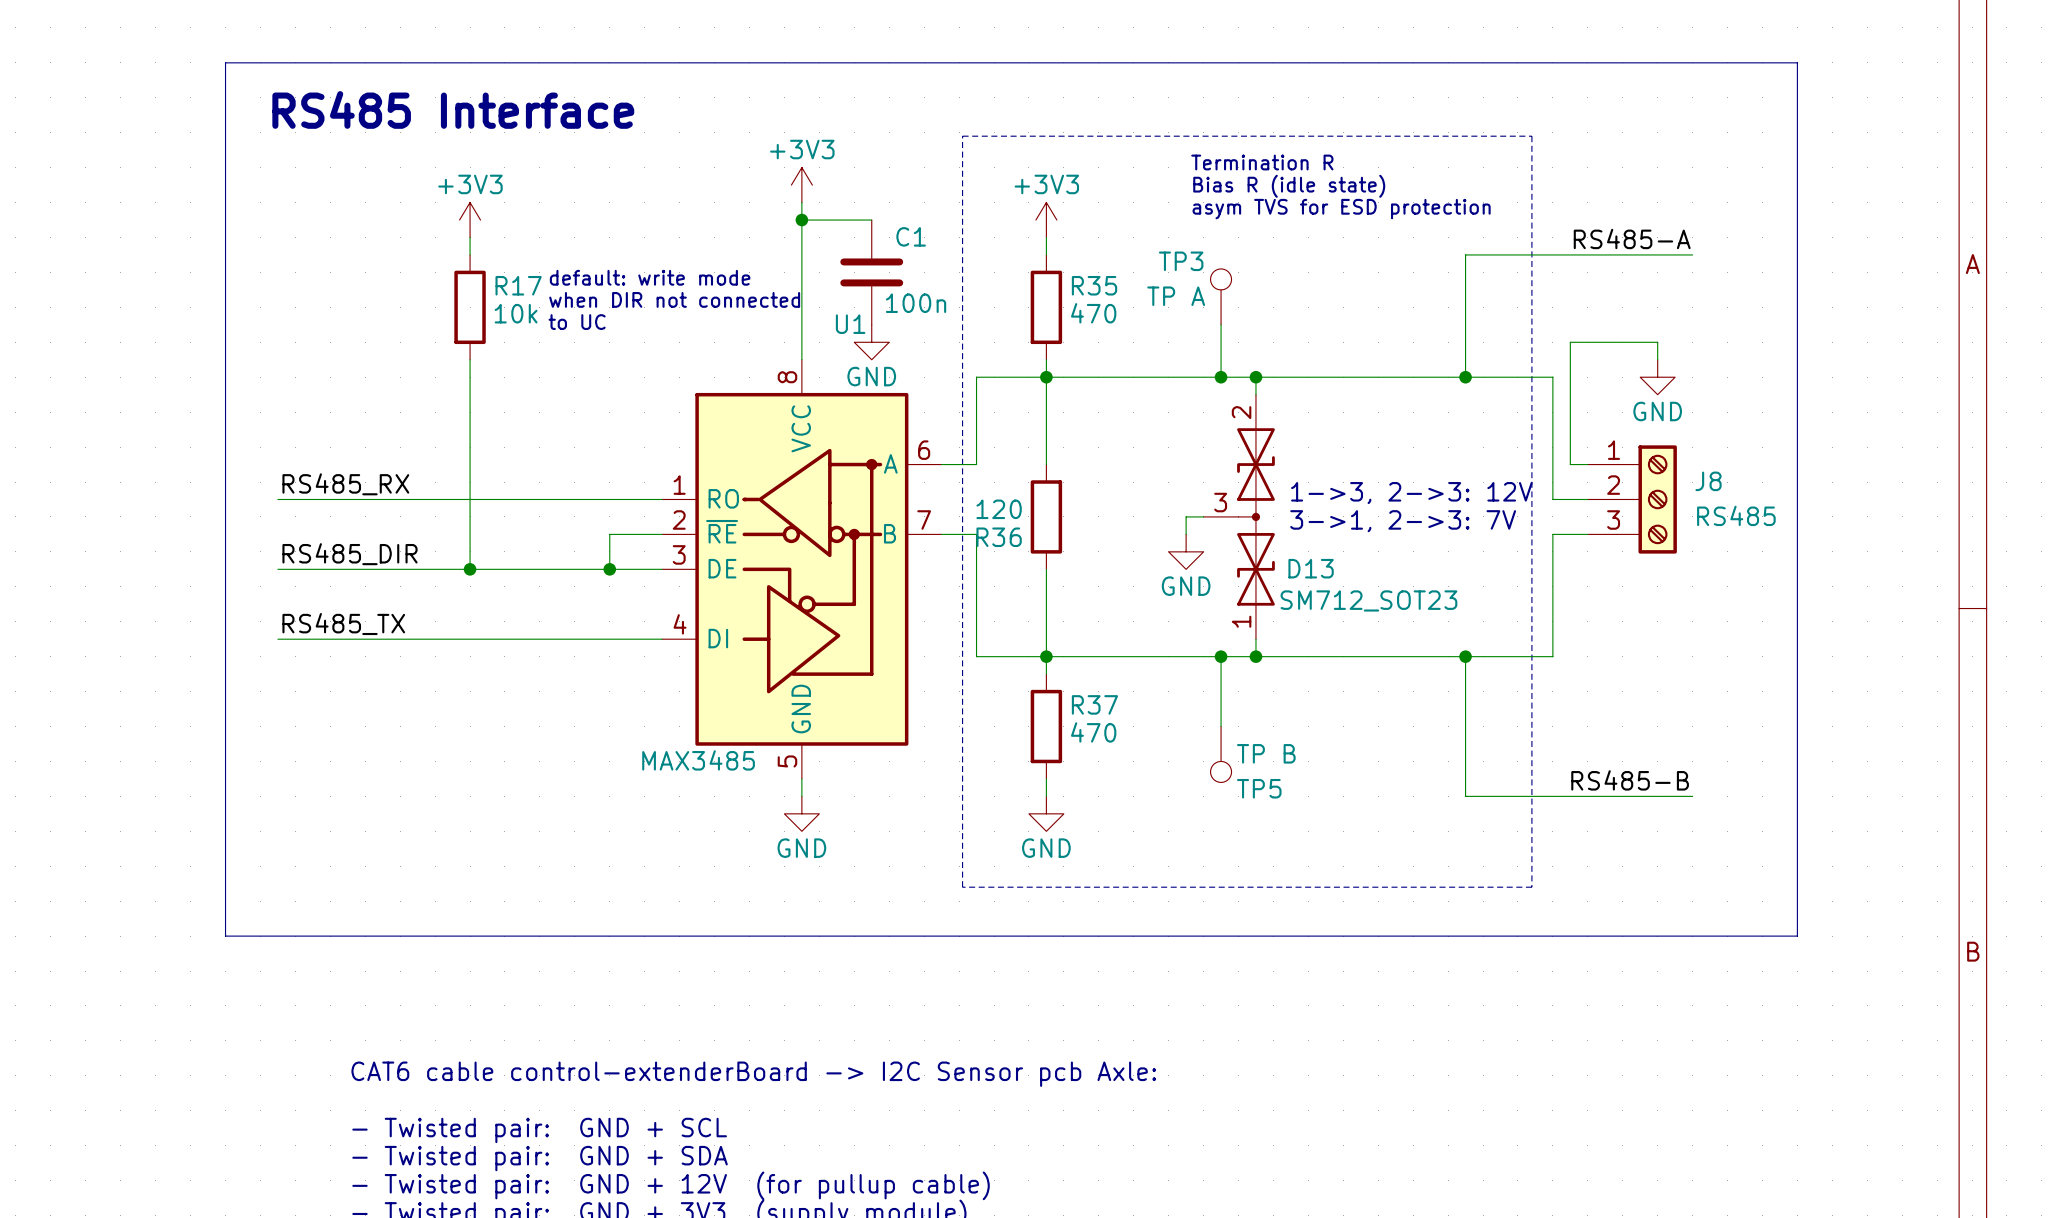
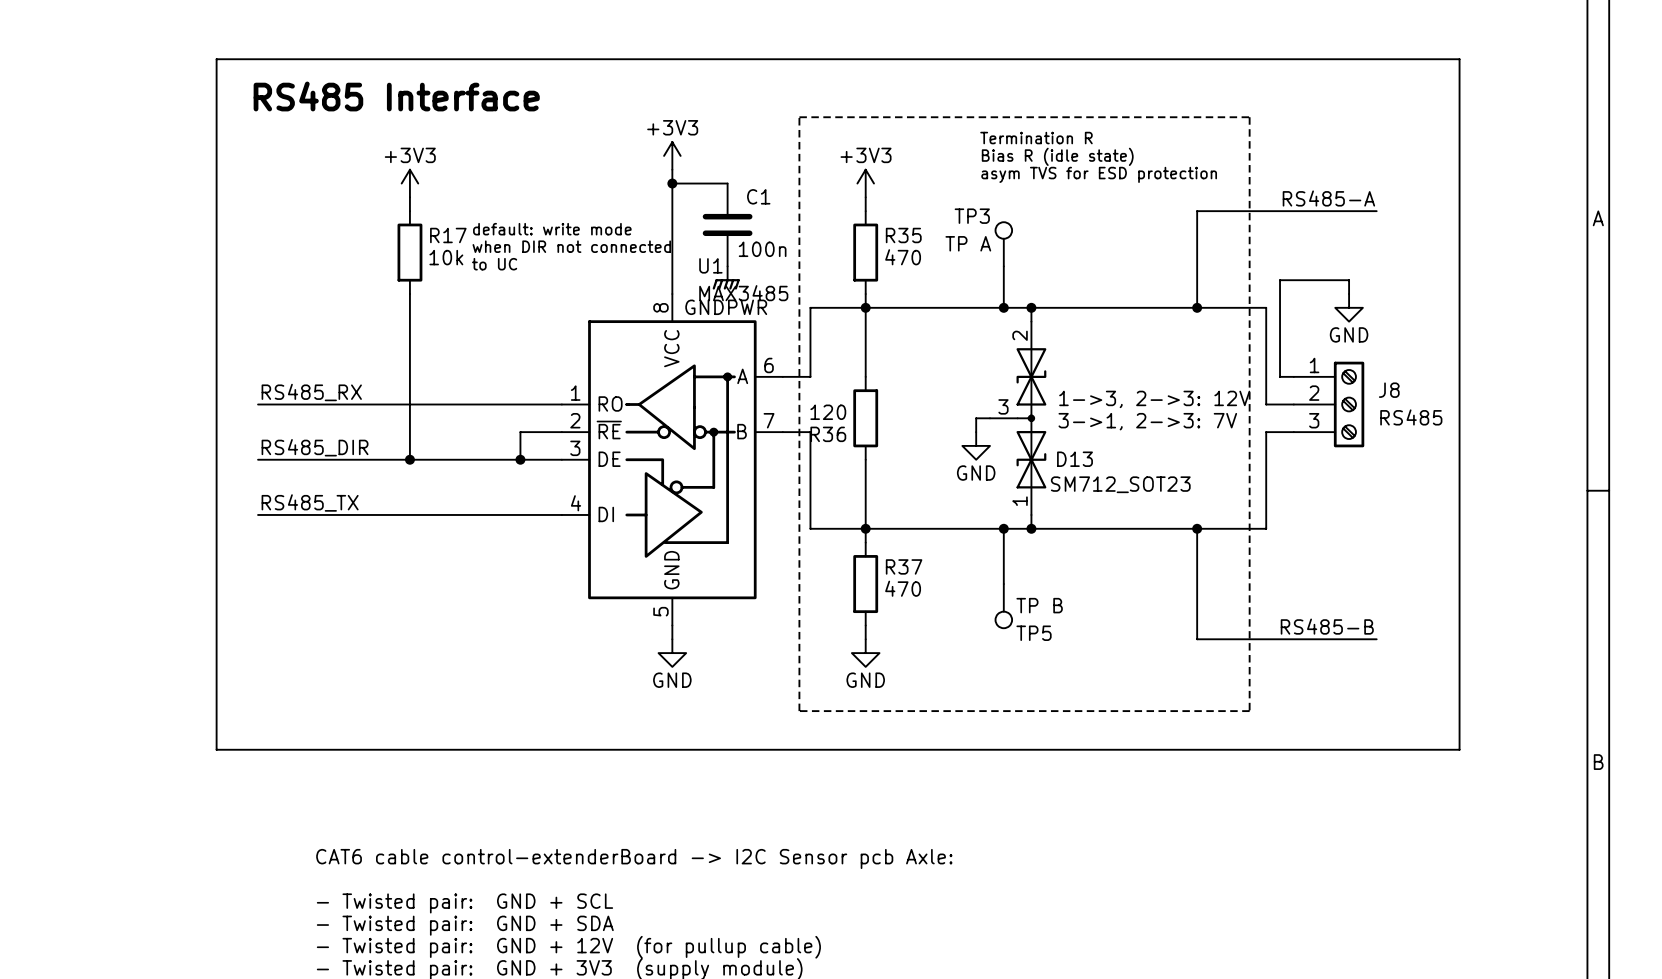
power symbol: GND (871, 342) -> GNDPWR (726, 277)
U1 value position: MAX3485 (698, 760) -> MAX3485 (743, 293)

